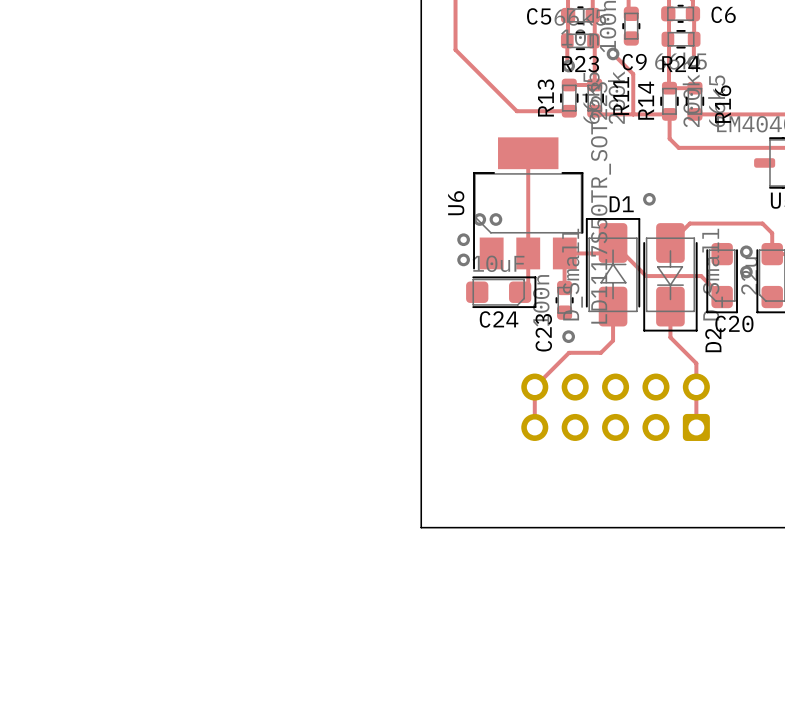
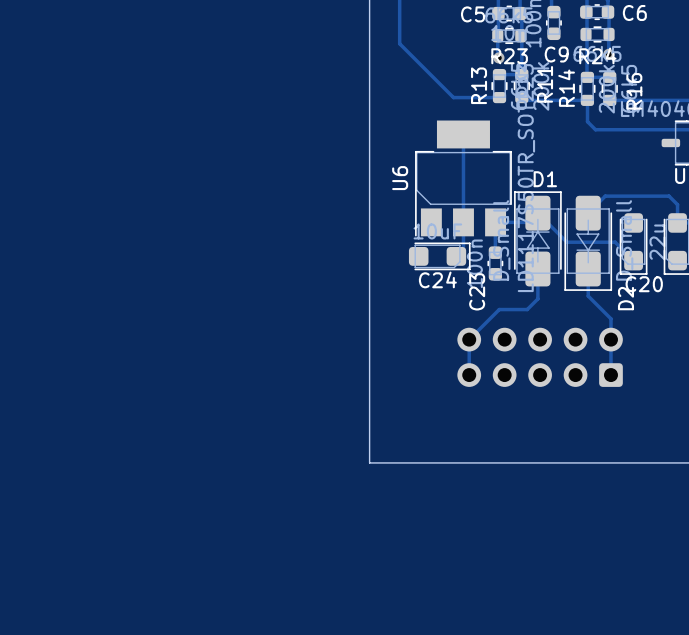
track: (613, 53) (633, 74) (633, 114) -> none
via: (613, 53) -> none
via: (649, 199) -> none
via: (479, 219) -> none
via: (495, 219) -> none
via: (463, 239) -> none
via: (746, 251) -> none
via: (463, 259) -> none
via: (746, 272) -> none
via: (568, 336) -> none

